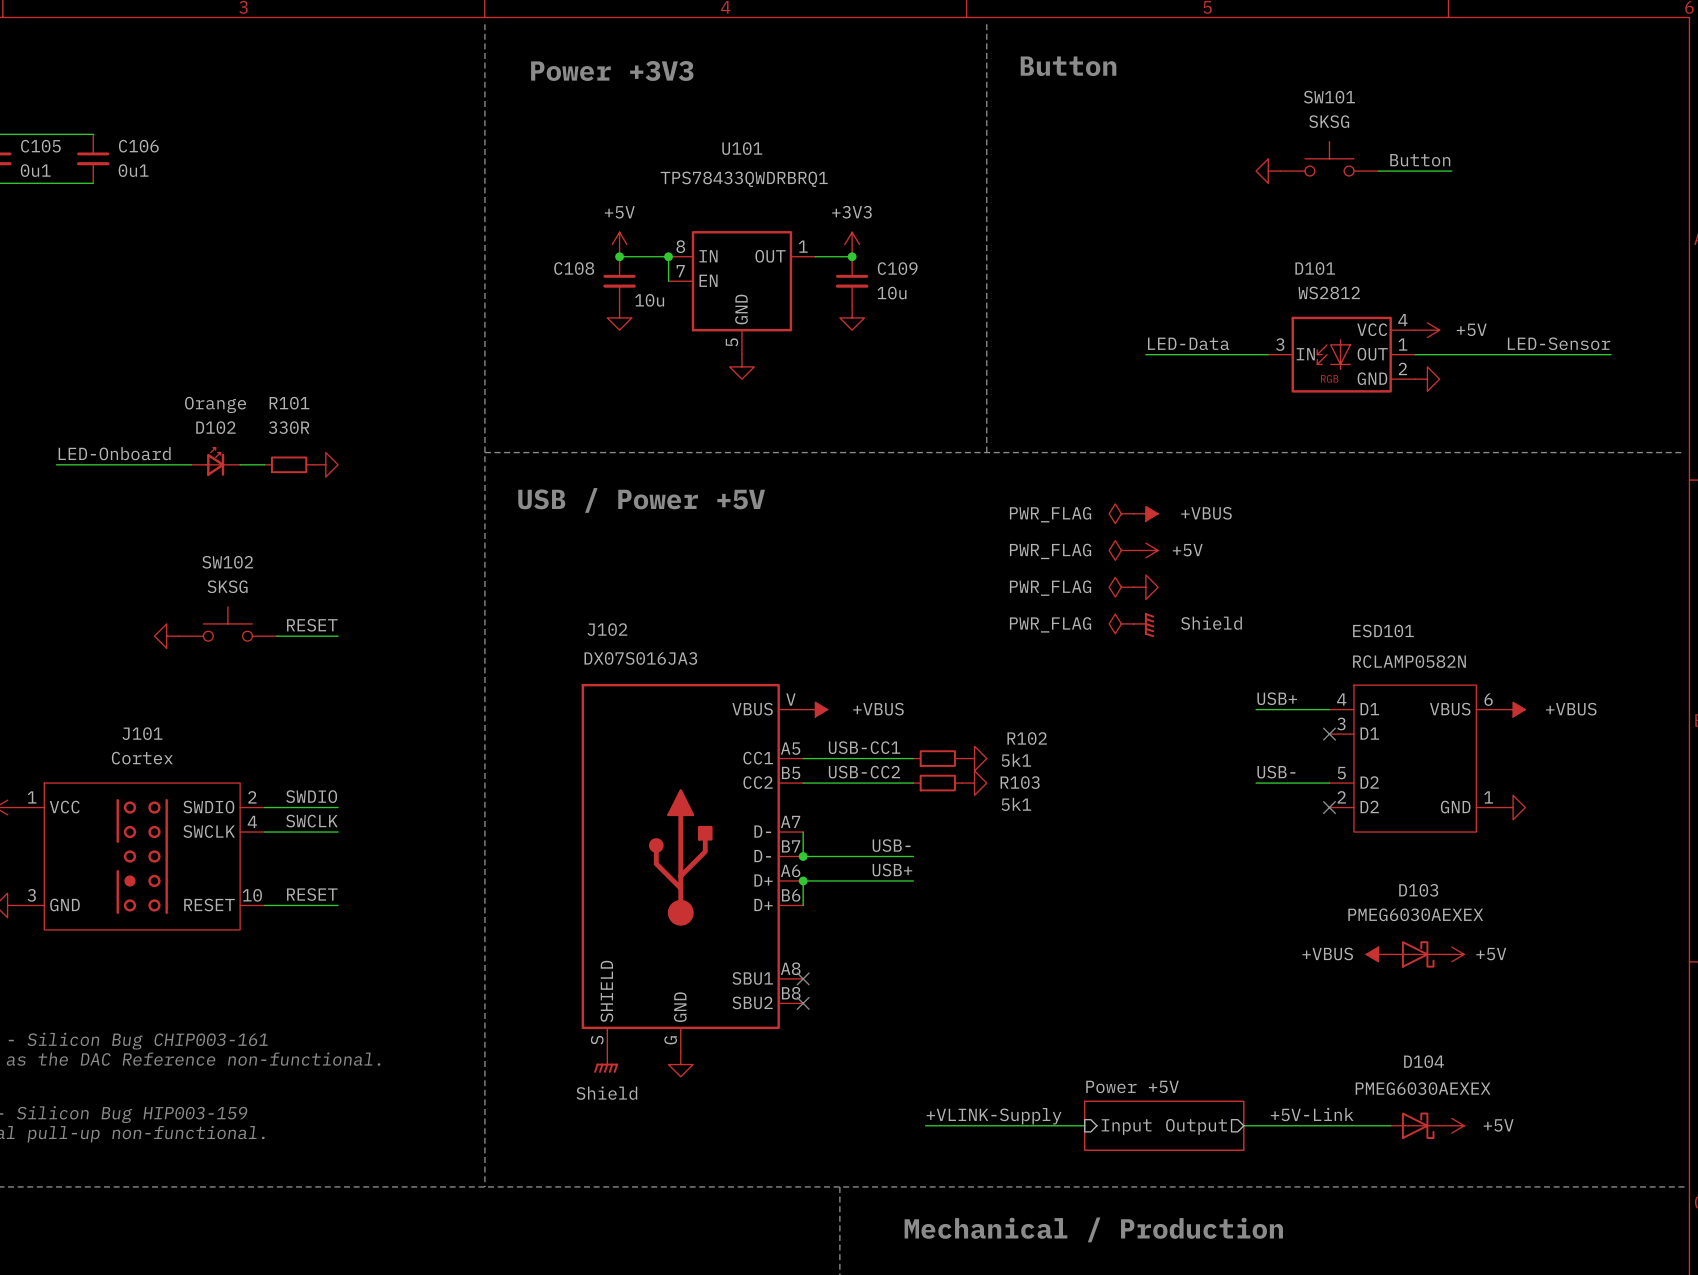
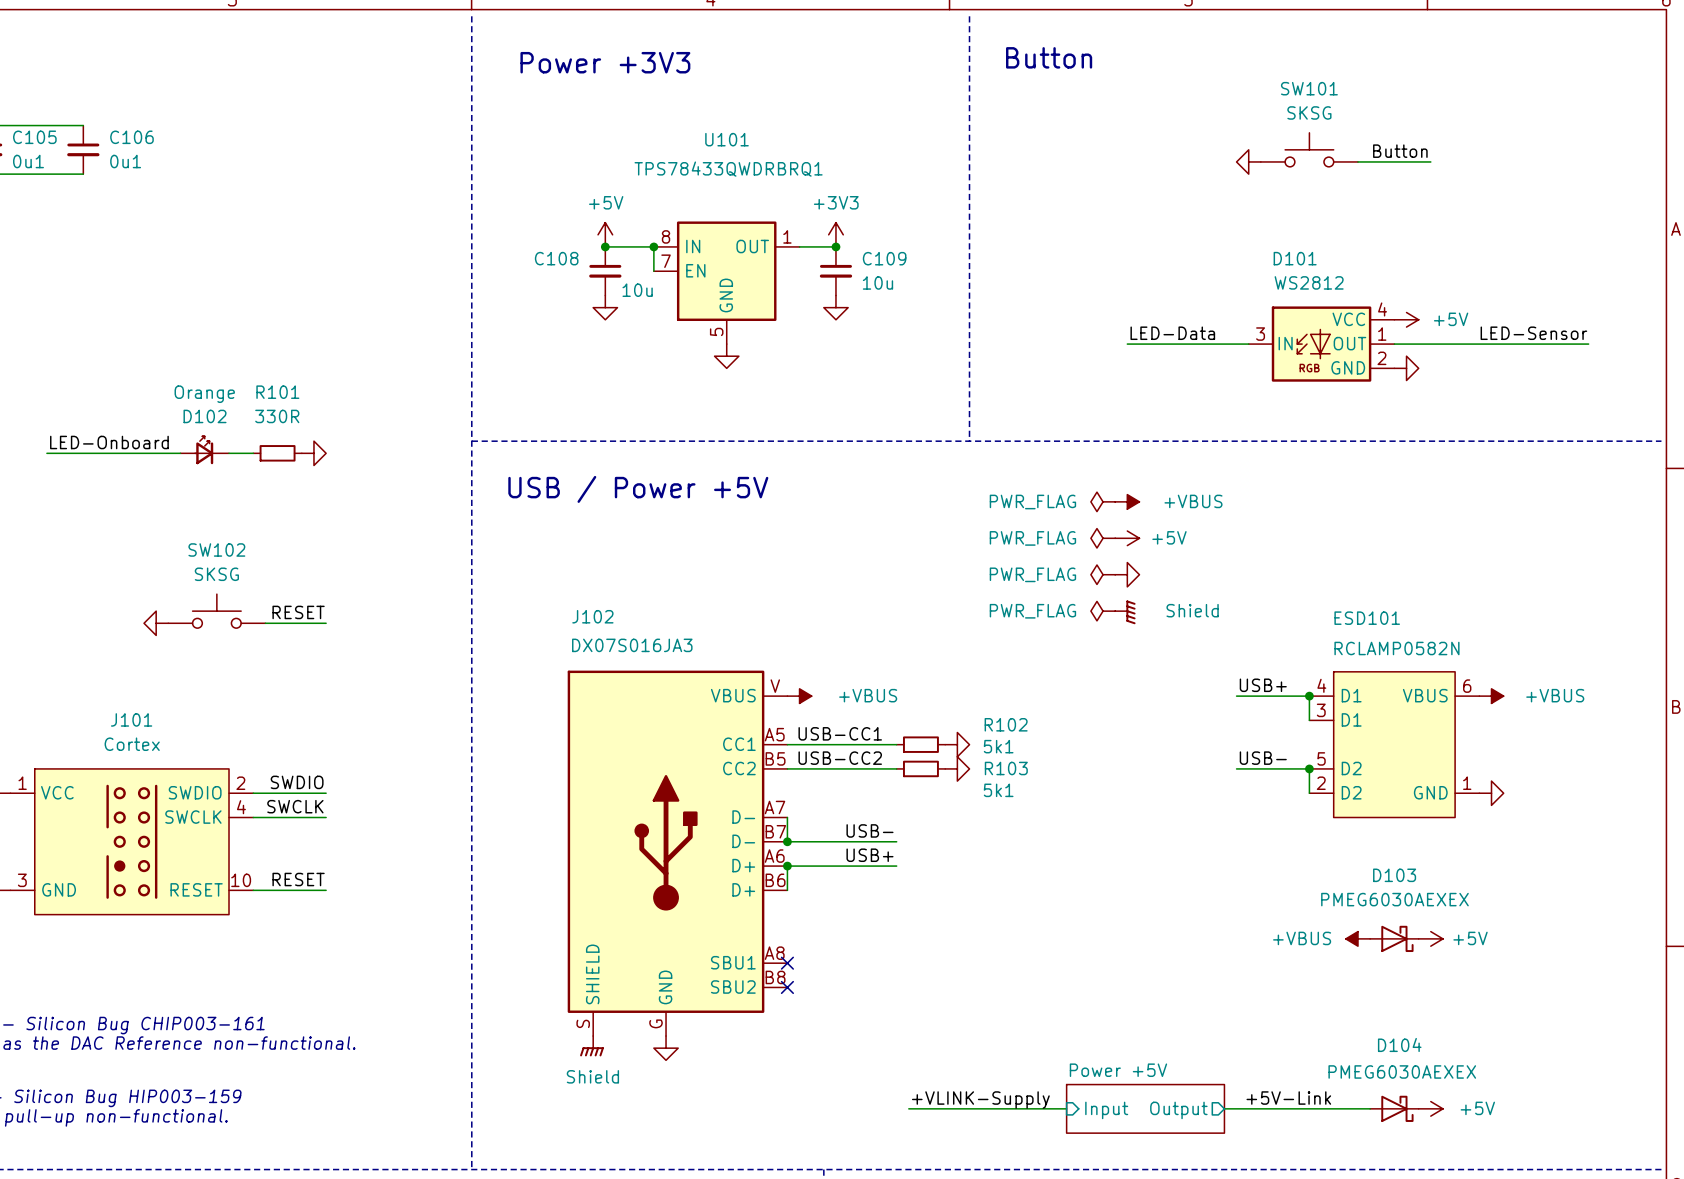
wire: none -> (1309, 696) (1309, 720)
junction: none -> (1309, 696)
no-connect mark: (1329, 734) -> none
wire: none -> (1309, 768) (1309, 793)
junction: none -> (1309, 768)
no-connect mark: (1329, 807) -> none

